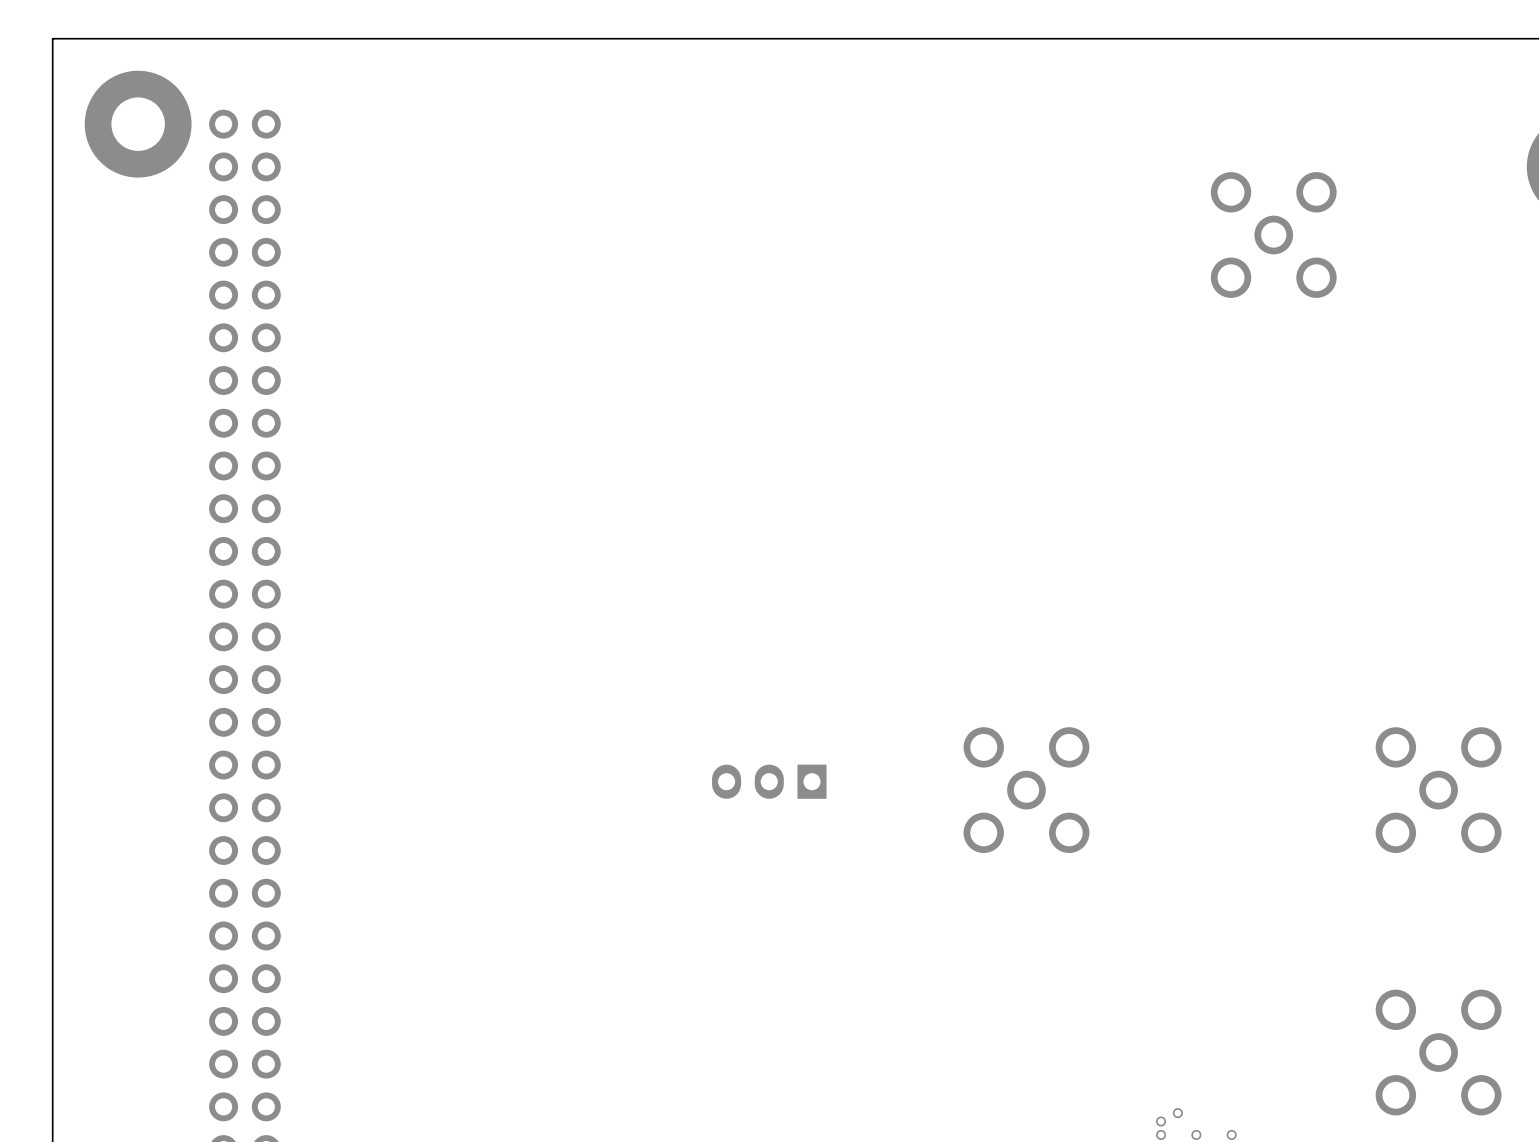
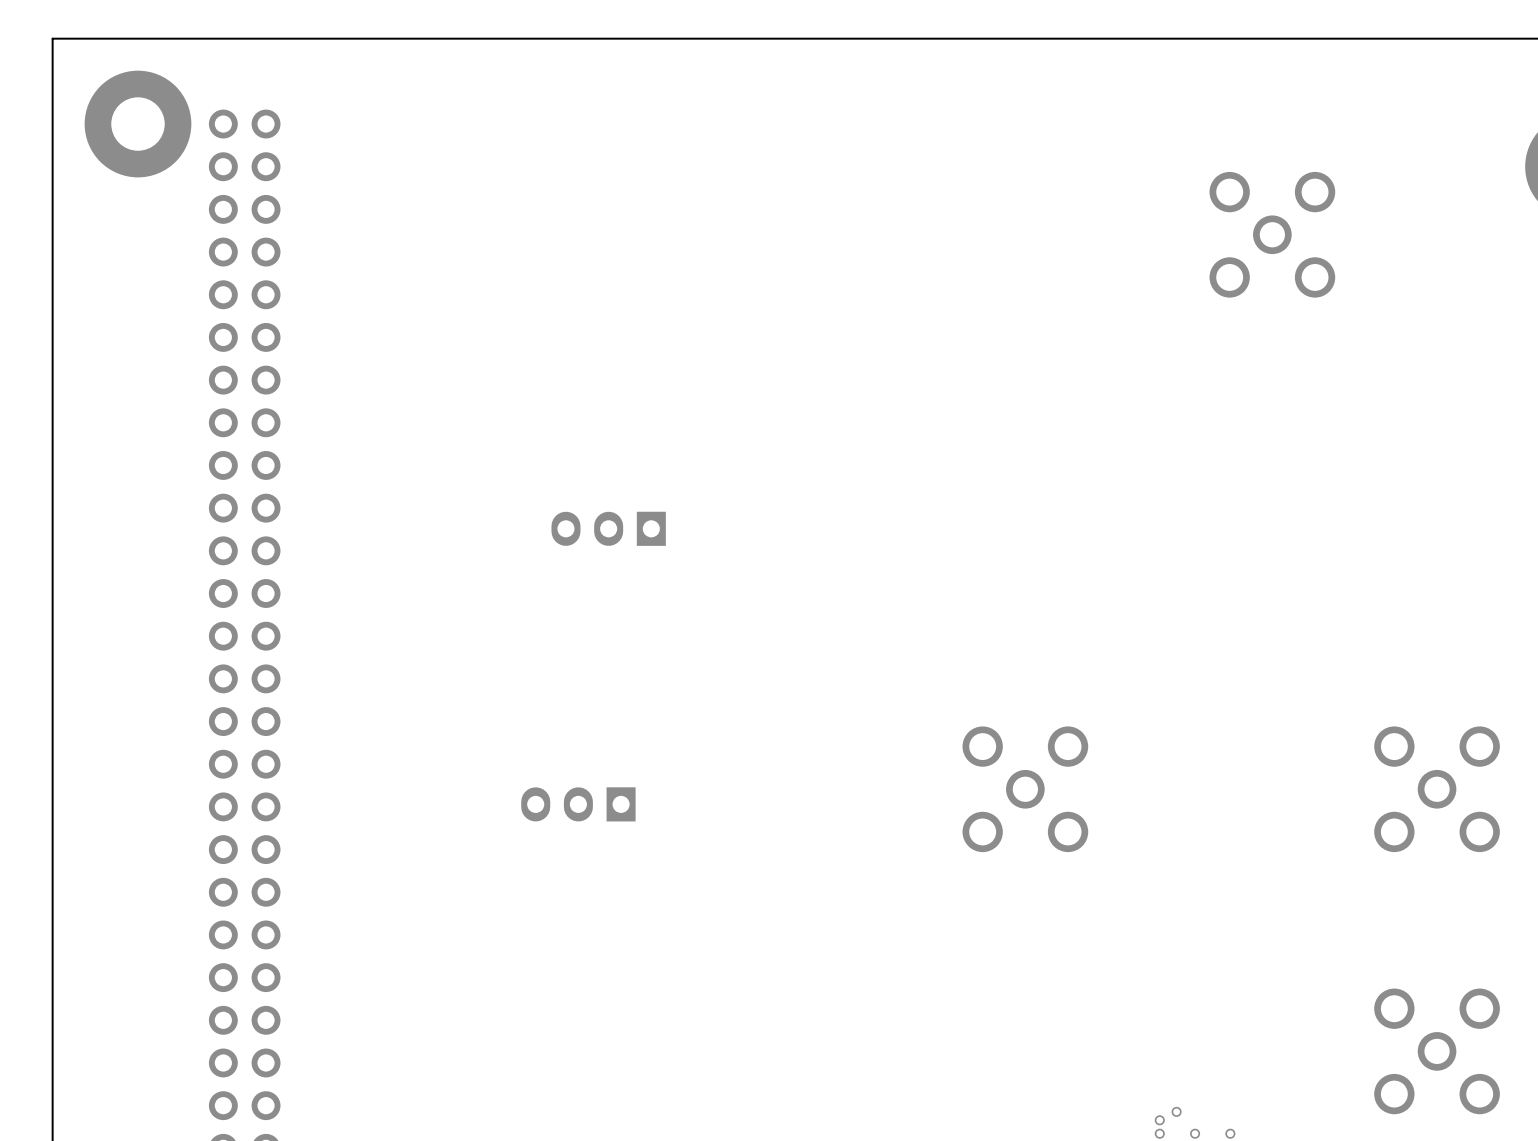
part: none -> (608, 528)
part: (769, 781) -> none
part: none -> (578, 804)

